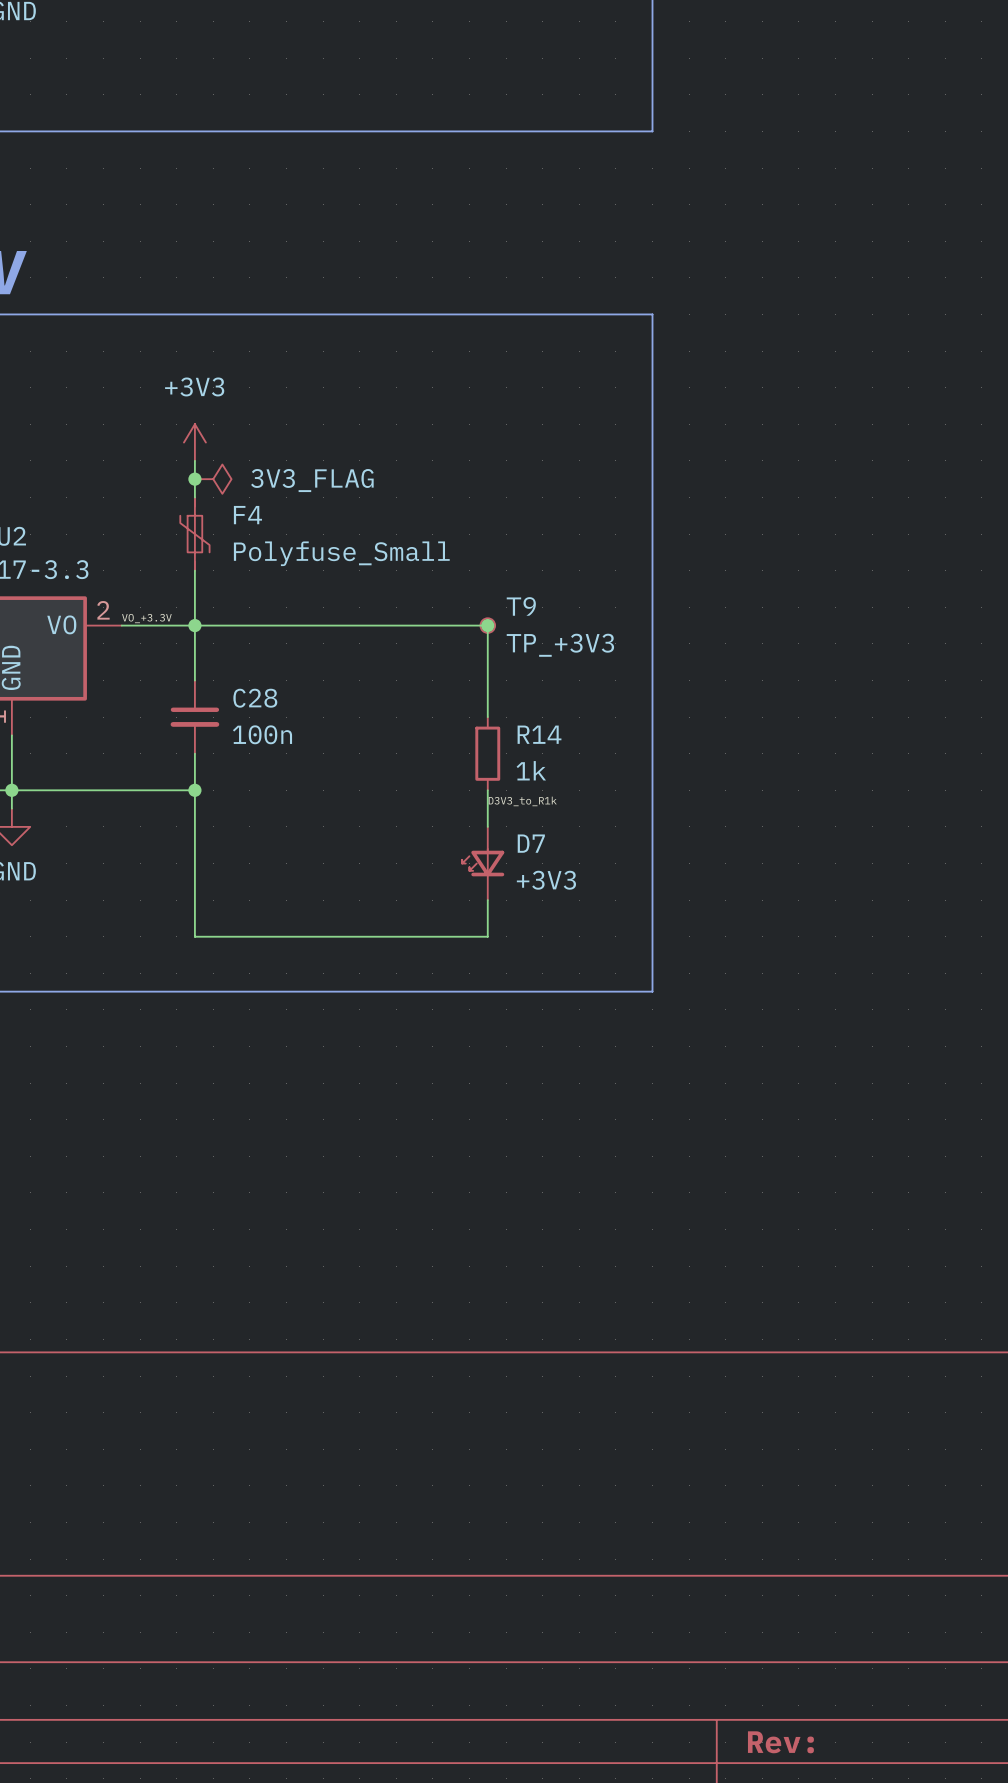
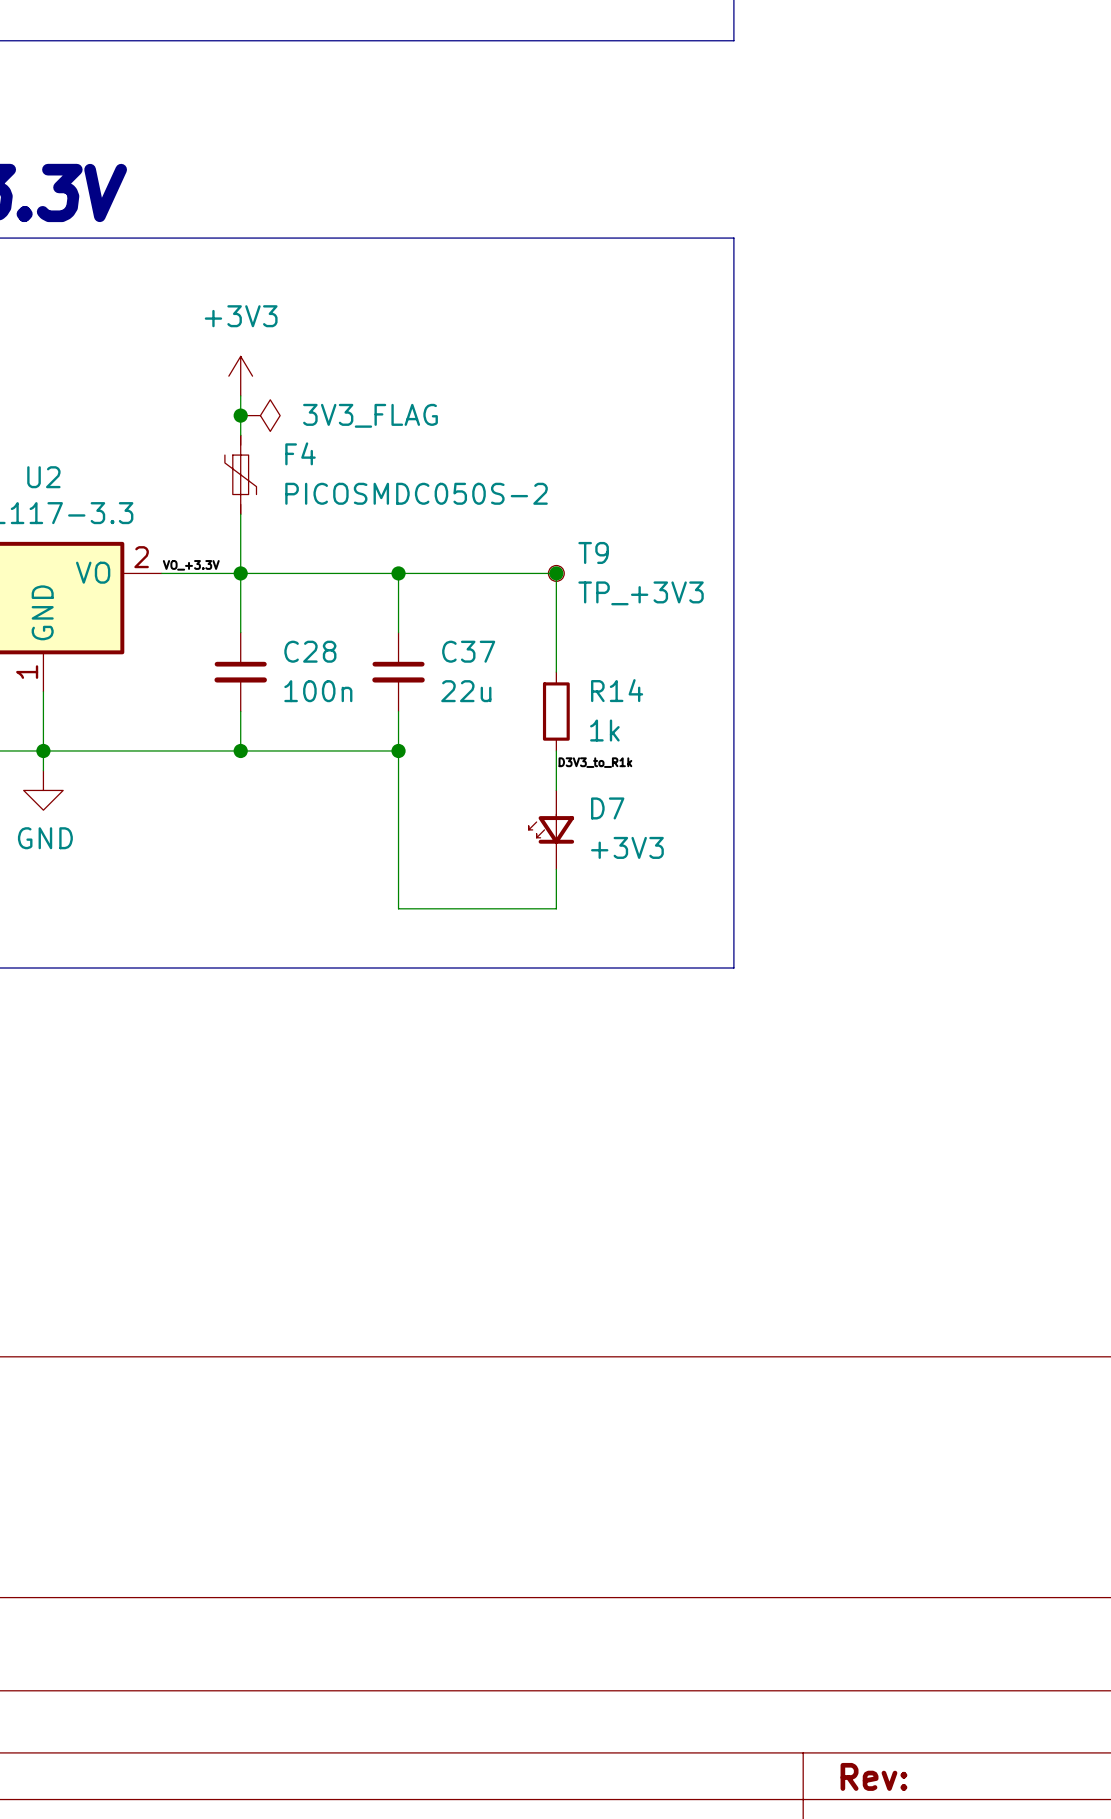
F4 value: Polyfuse_Small (341, 553) -> PICOSMDC050S-2 (416, 493)
wire: none -> (398, 573) (398, 632)
junction: none -> (398, 573)
C37: none -> 22u (398, 672)
wire: none -> (398, 711) (398, 908)
wire: (194, 790) (194, 936) (341, 936) -> (240, 750) (398, 750)
junction: none -> (398, 750)

